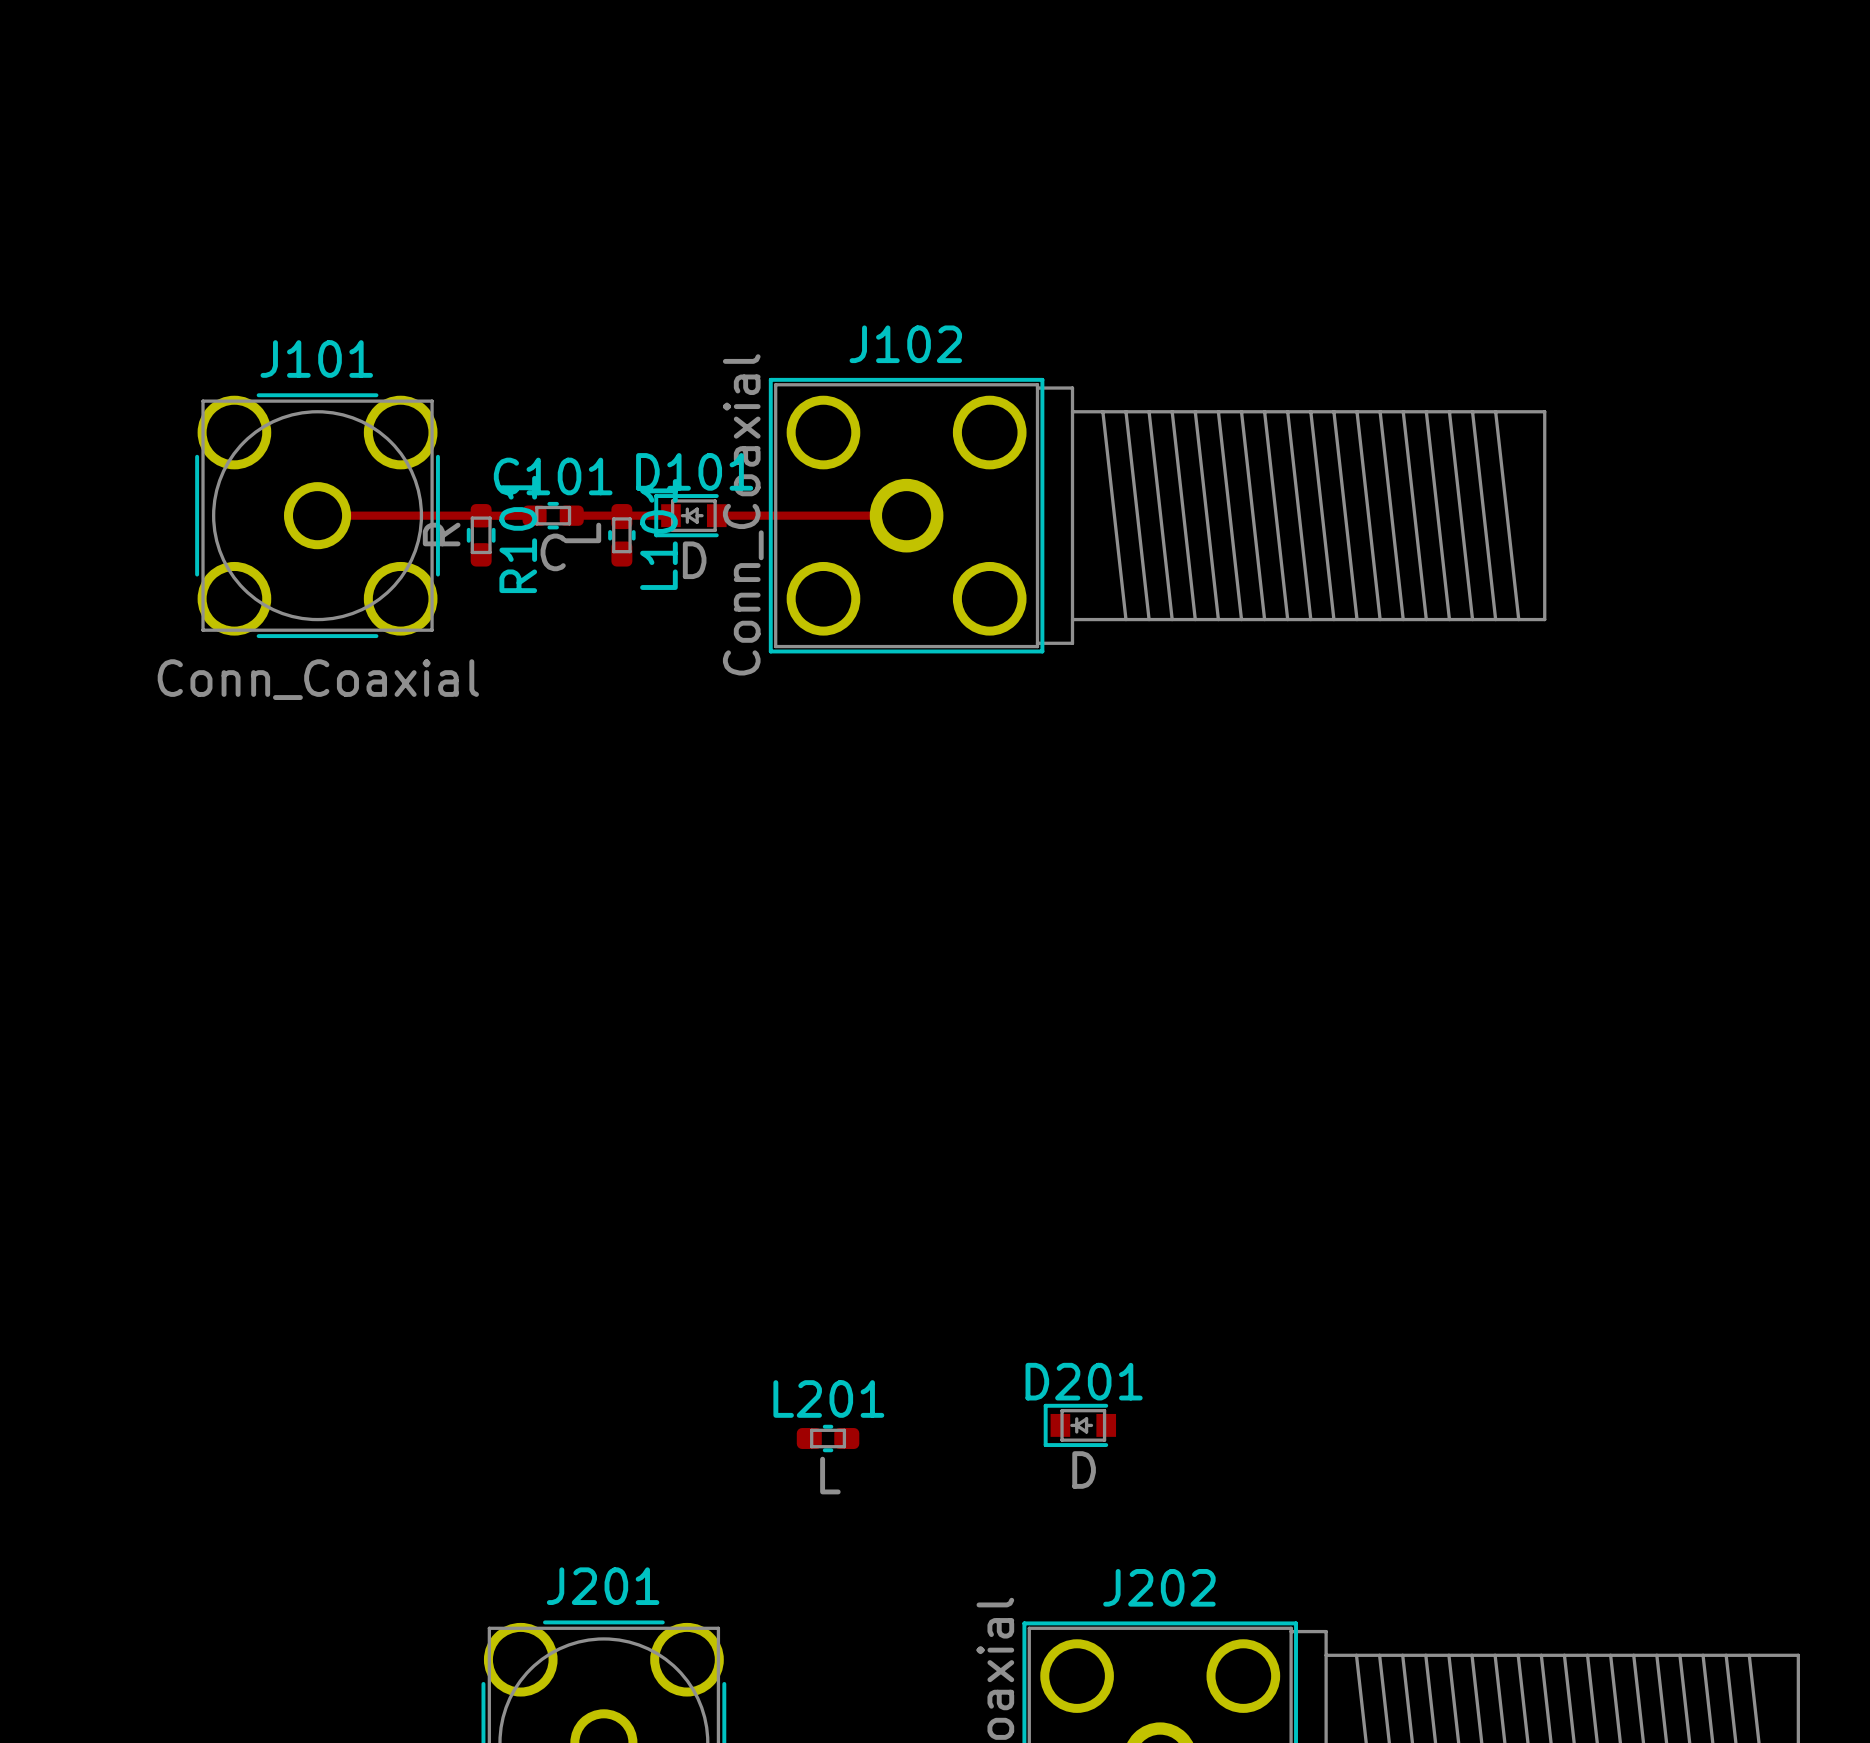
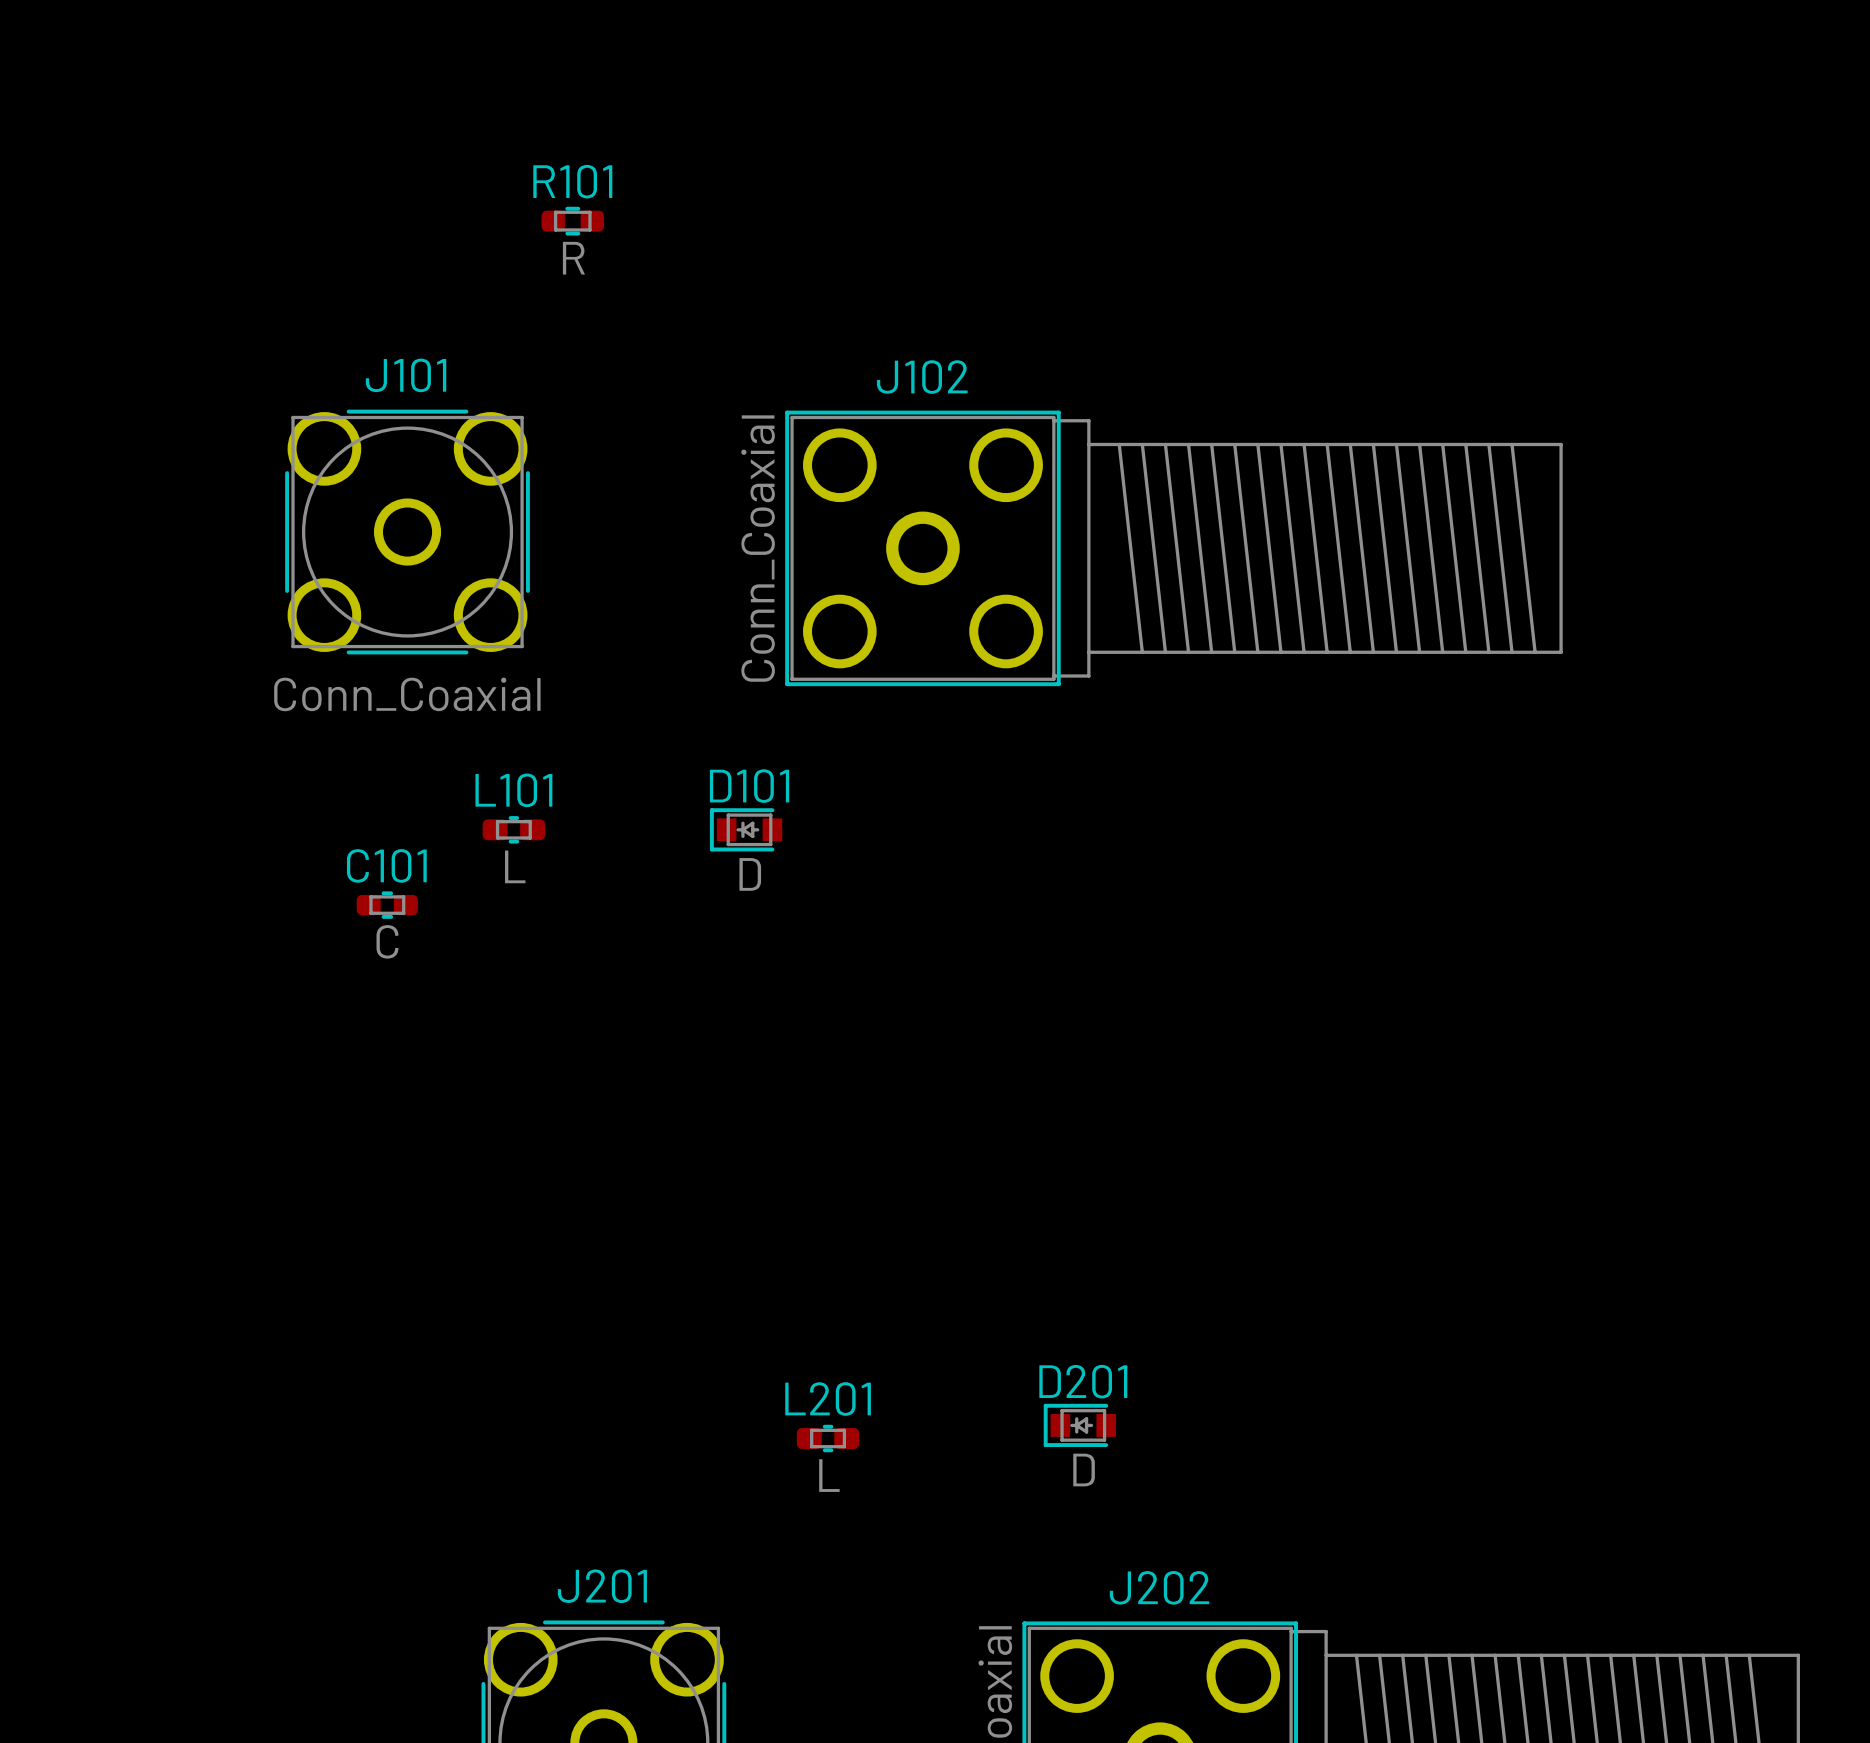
J101 position: (317, 515) -> (407, 532)
C101 position: (553, 515) -> (387, 905)
track: (571, 515) (670, 515) -> none
D101 position: (690, 515) -> (746, 829)
track: (716, 515) (906, 515) -> none
J102 position: (1157, 515) -> (1173, 548)
R101 rotation: 0° (481, 535) -> 90° clockwise (572, 221)
R101 position: (481, 535) -> (572, 221)
L101 rotation: 0° (621, 535) -> 90° clockwise (513, 829)
L101 position: (621, 535) -> (513, 829)

